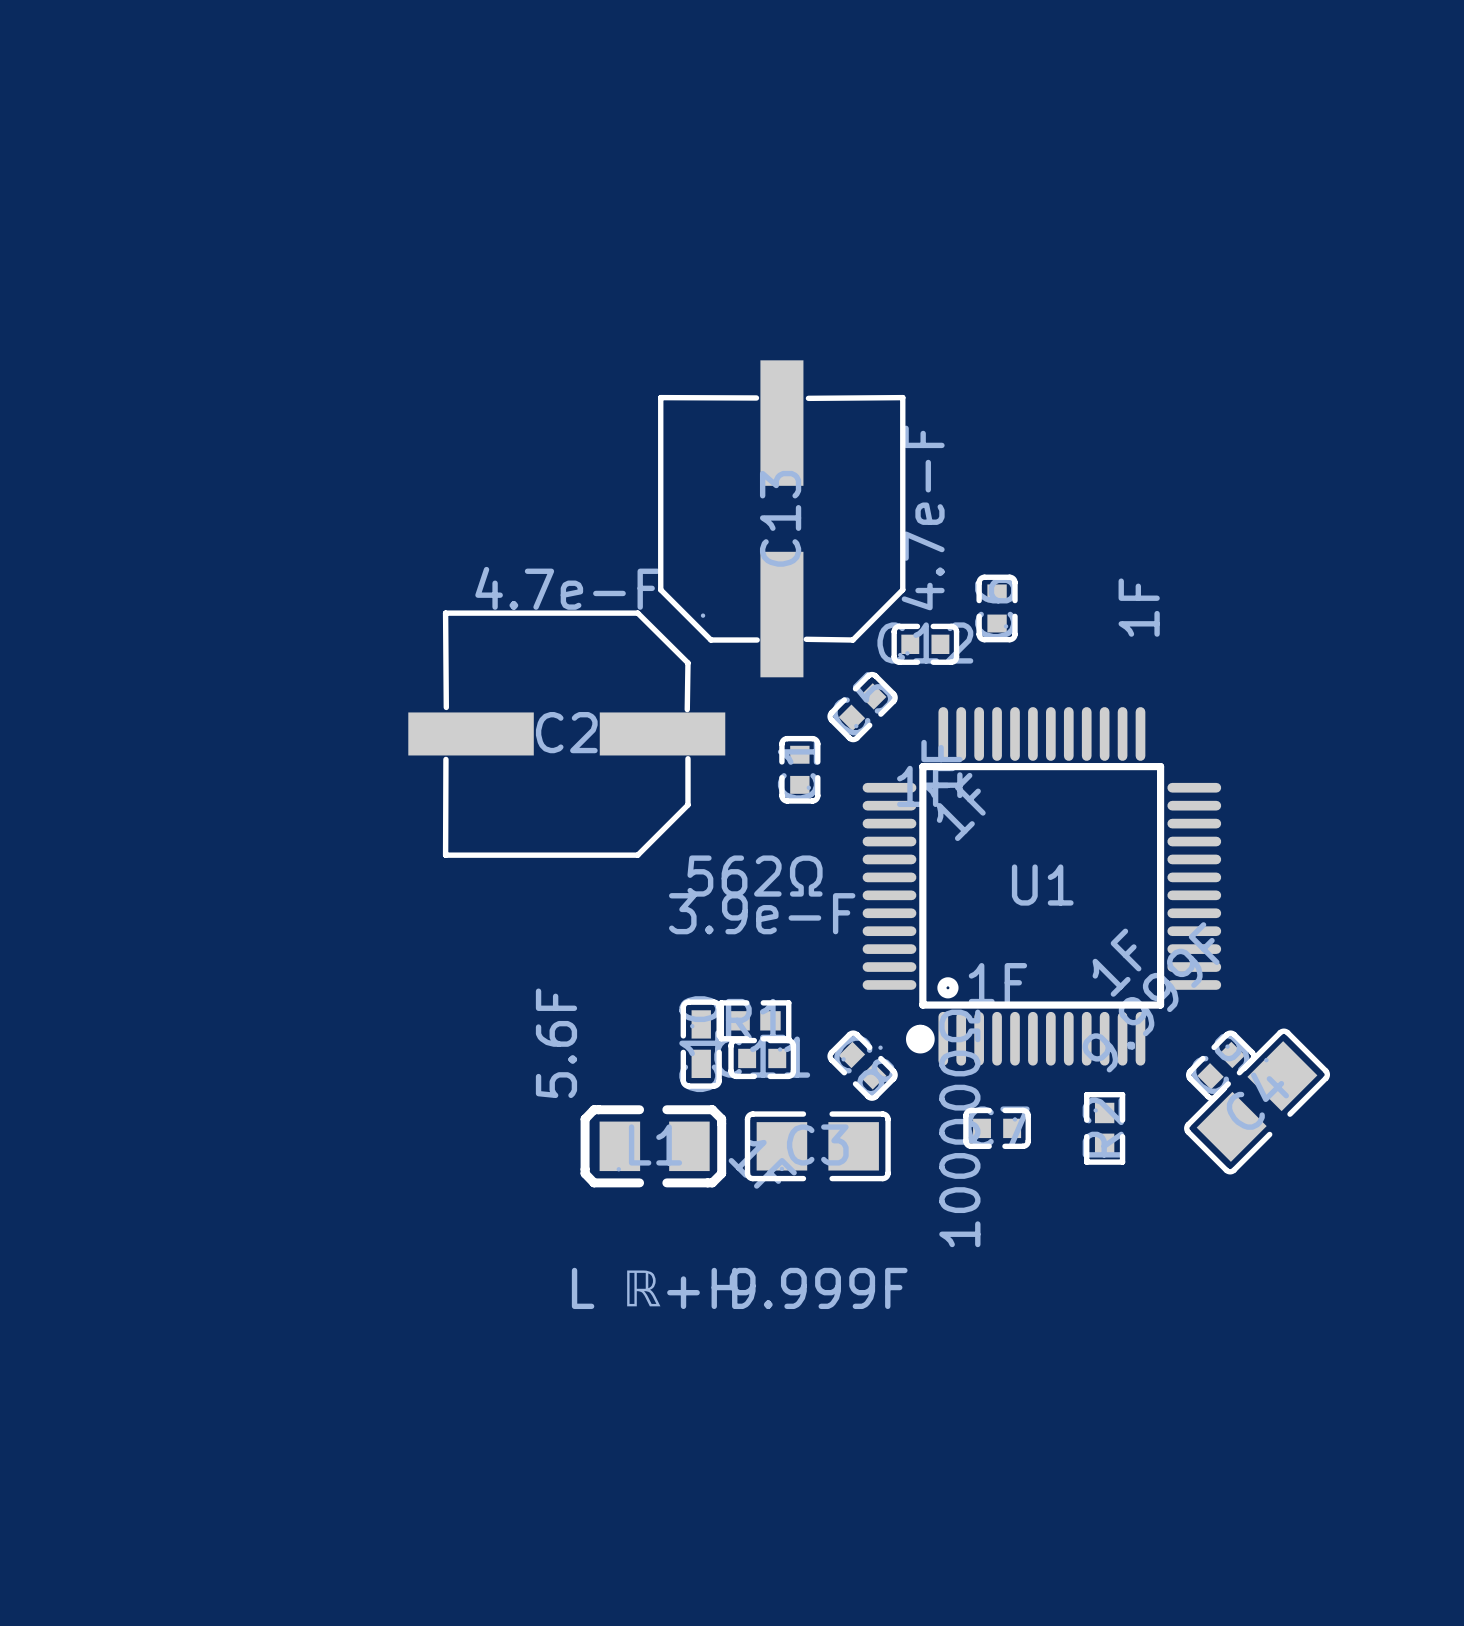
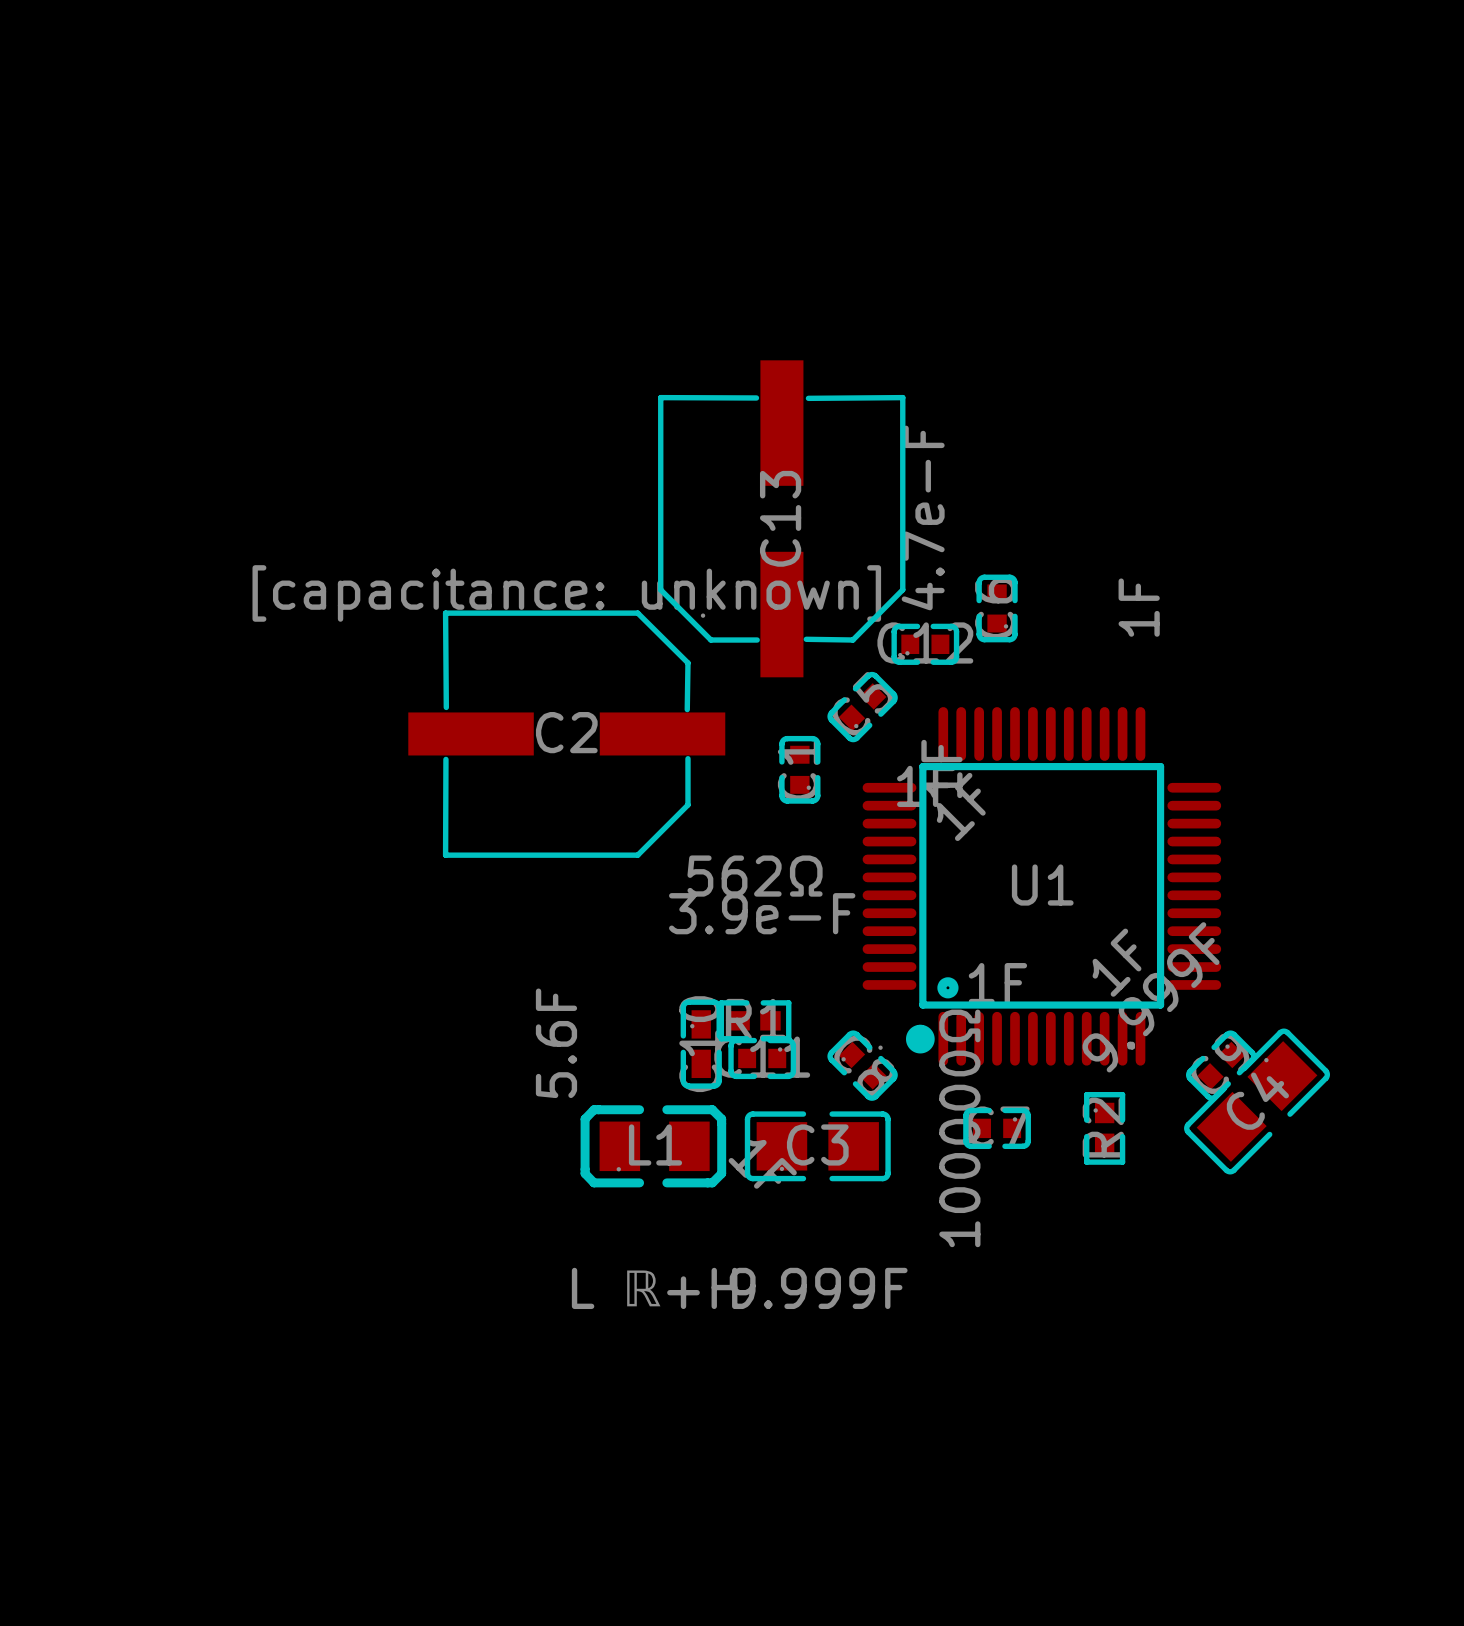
C2 value: 4.7e-F (567, 588) -> [capacitance: unknown] (566, 593)

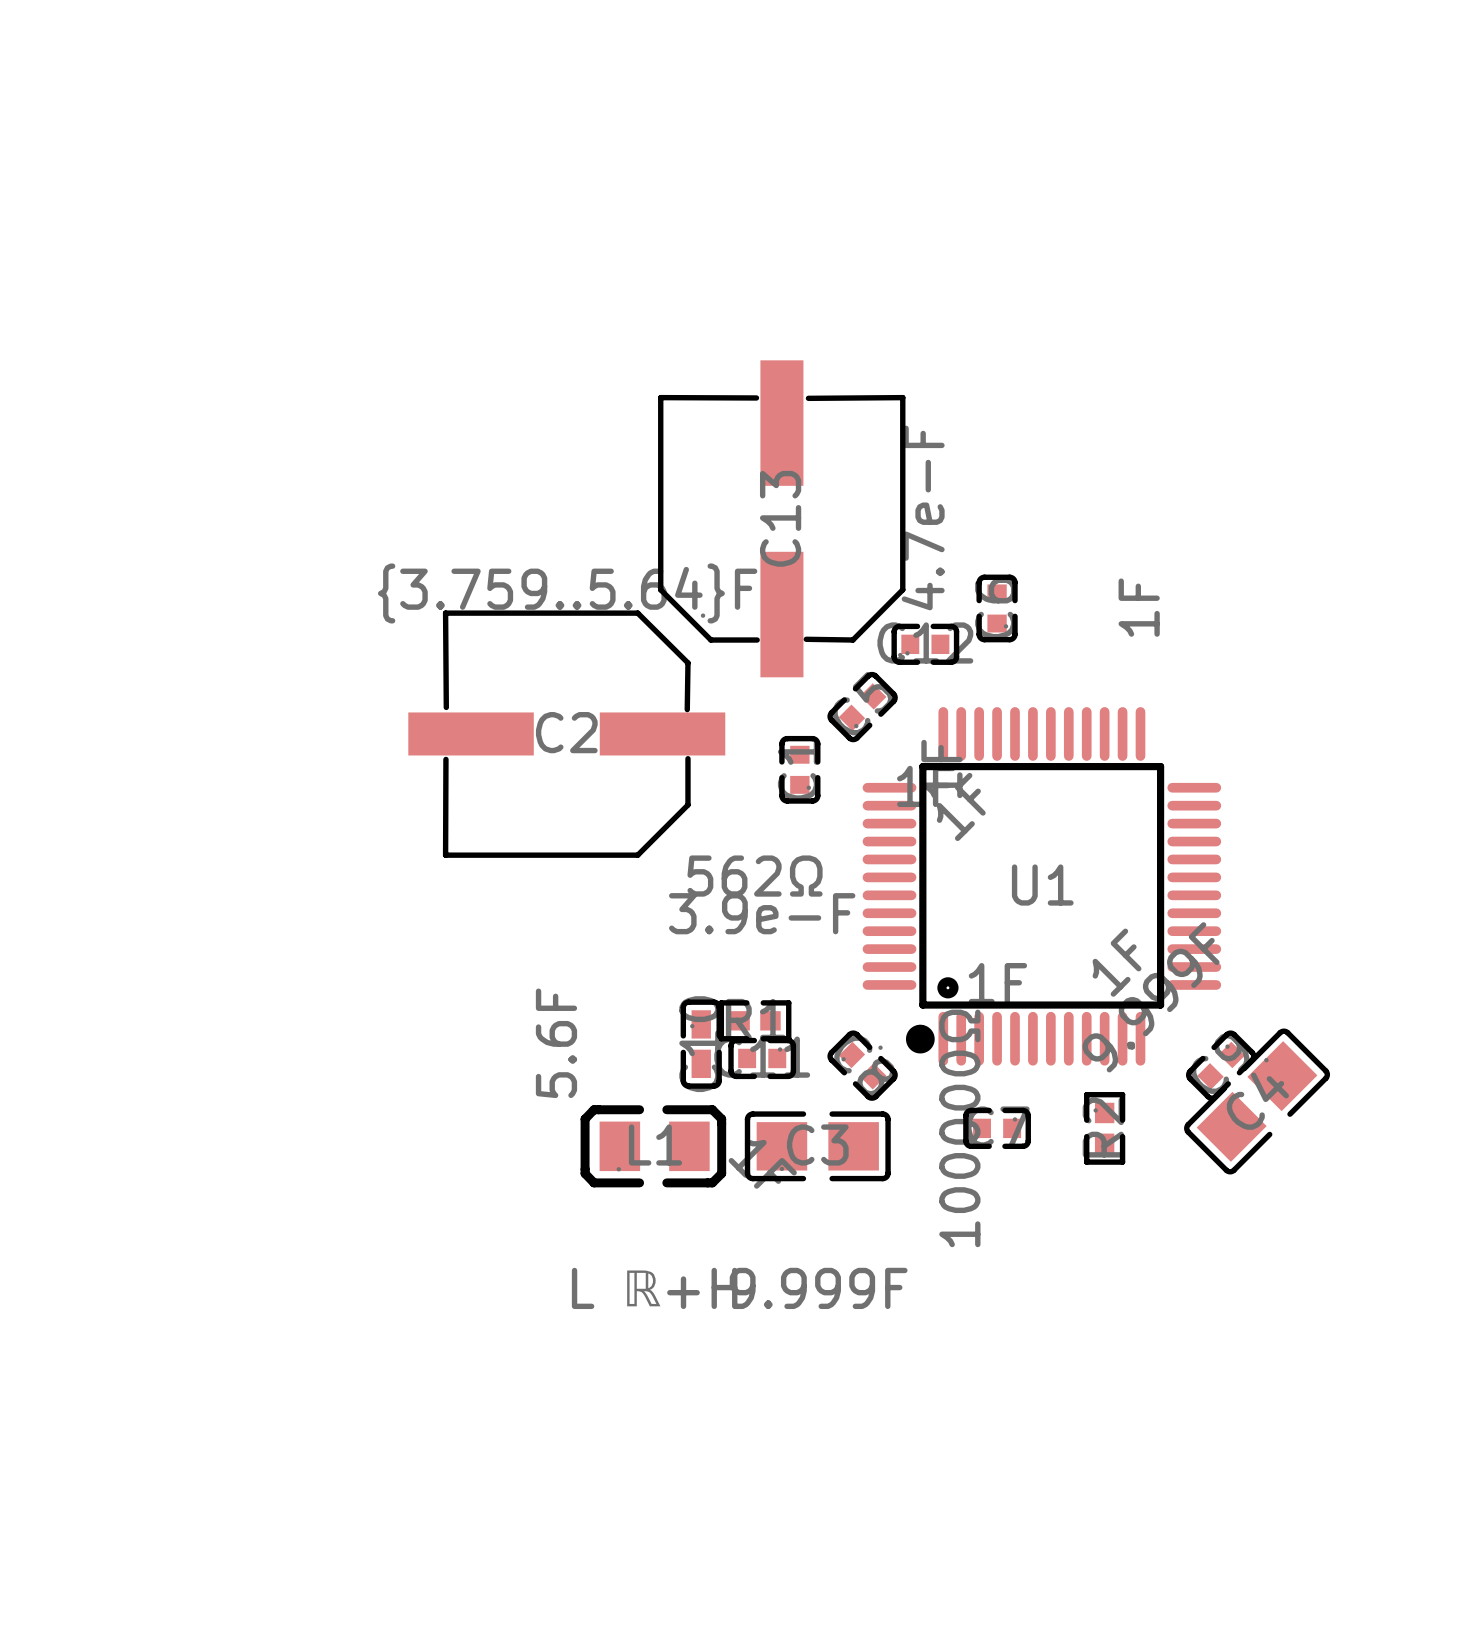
C2 value: [capacitance: unknown] (566, 593) -> {3.759..5.64}F (567, 593)

